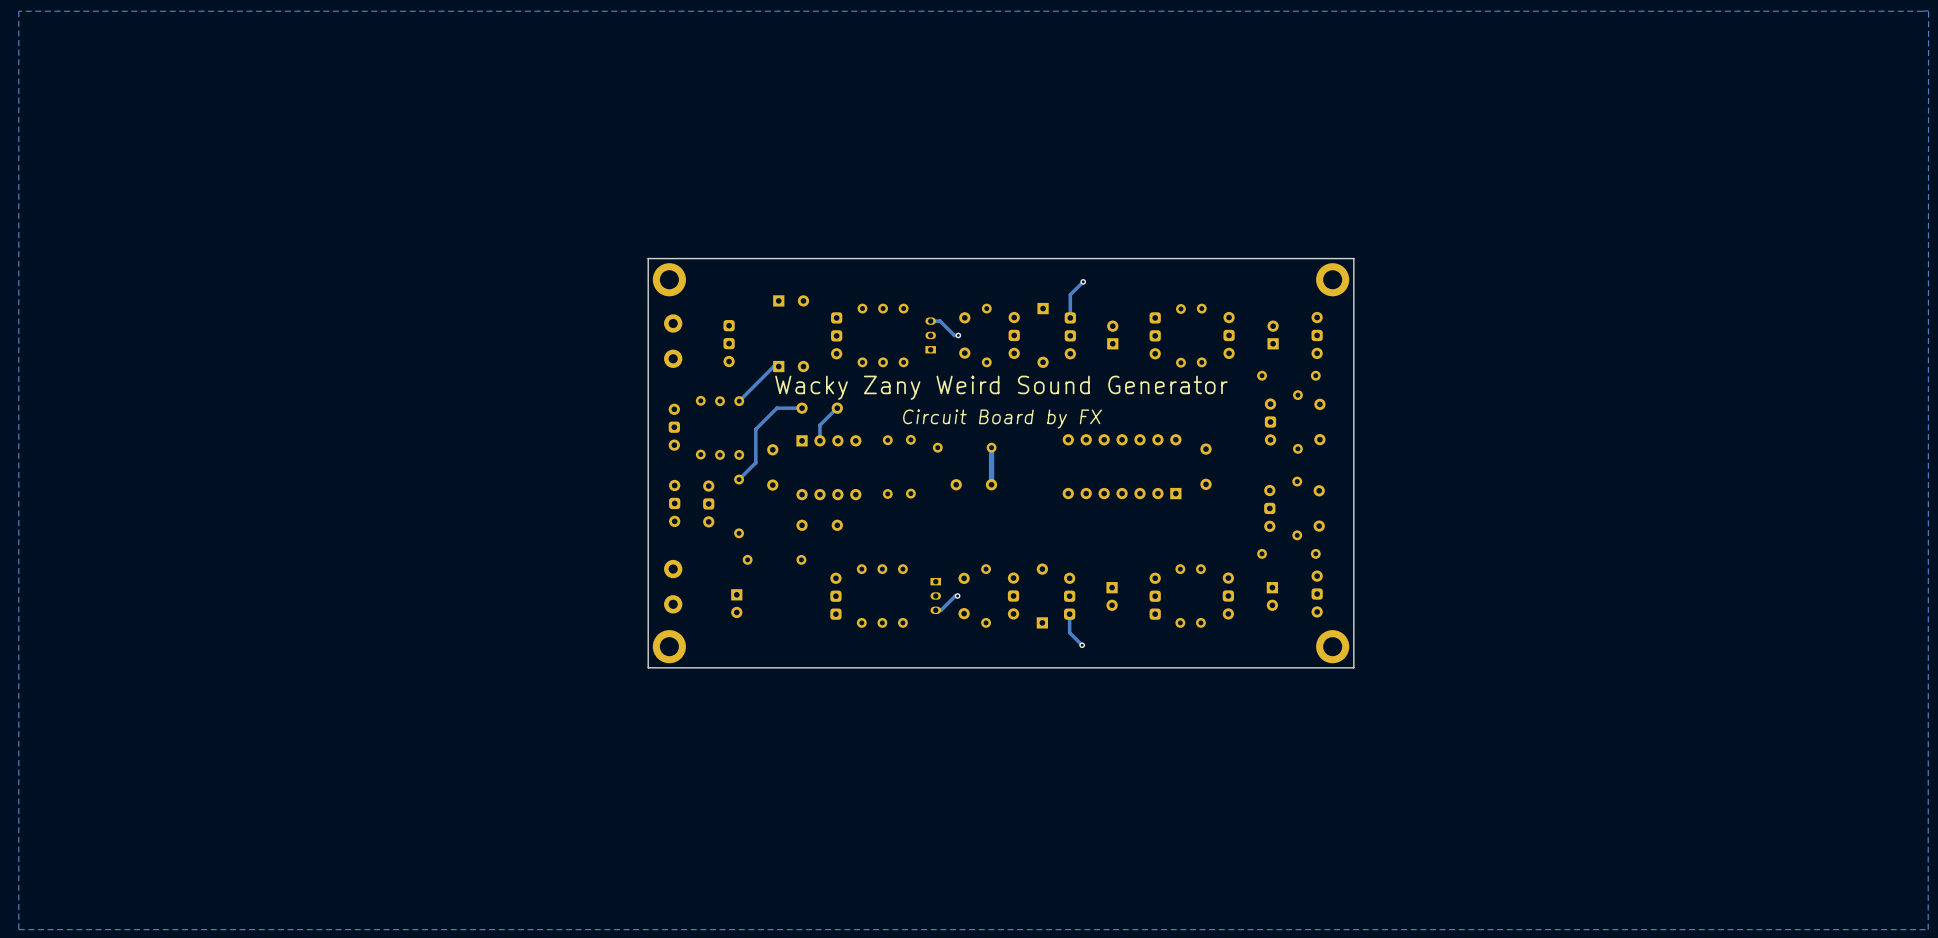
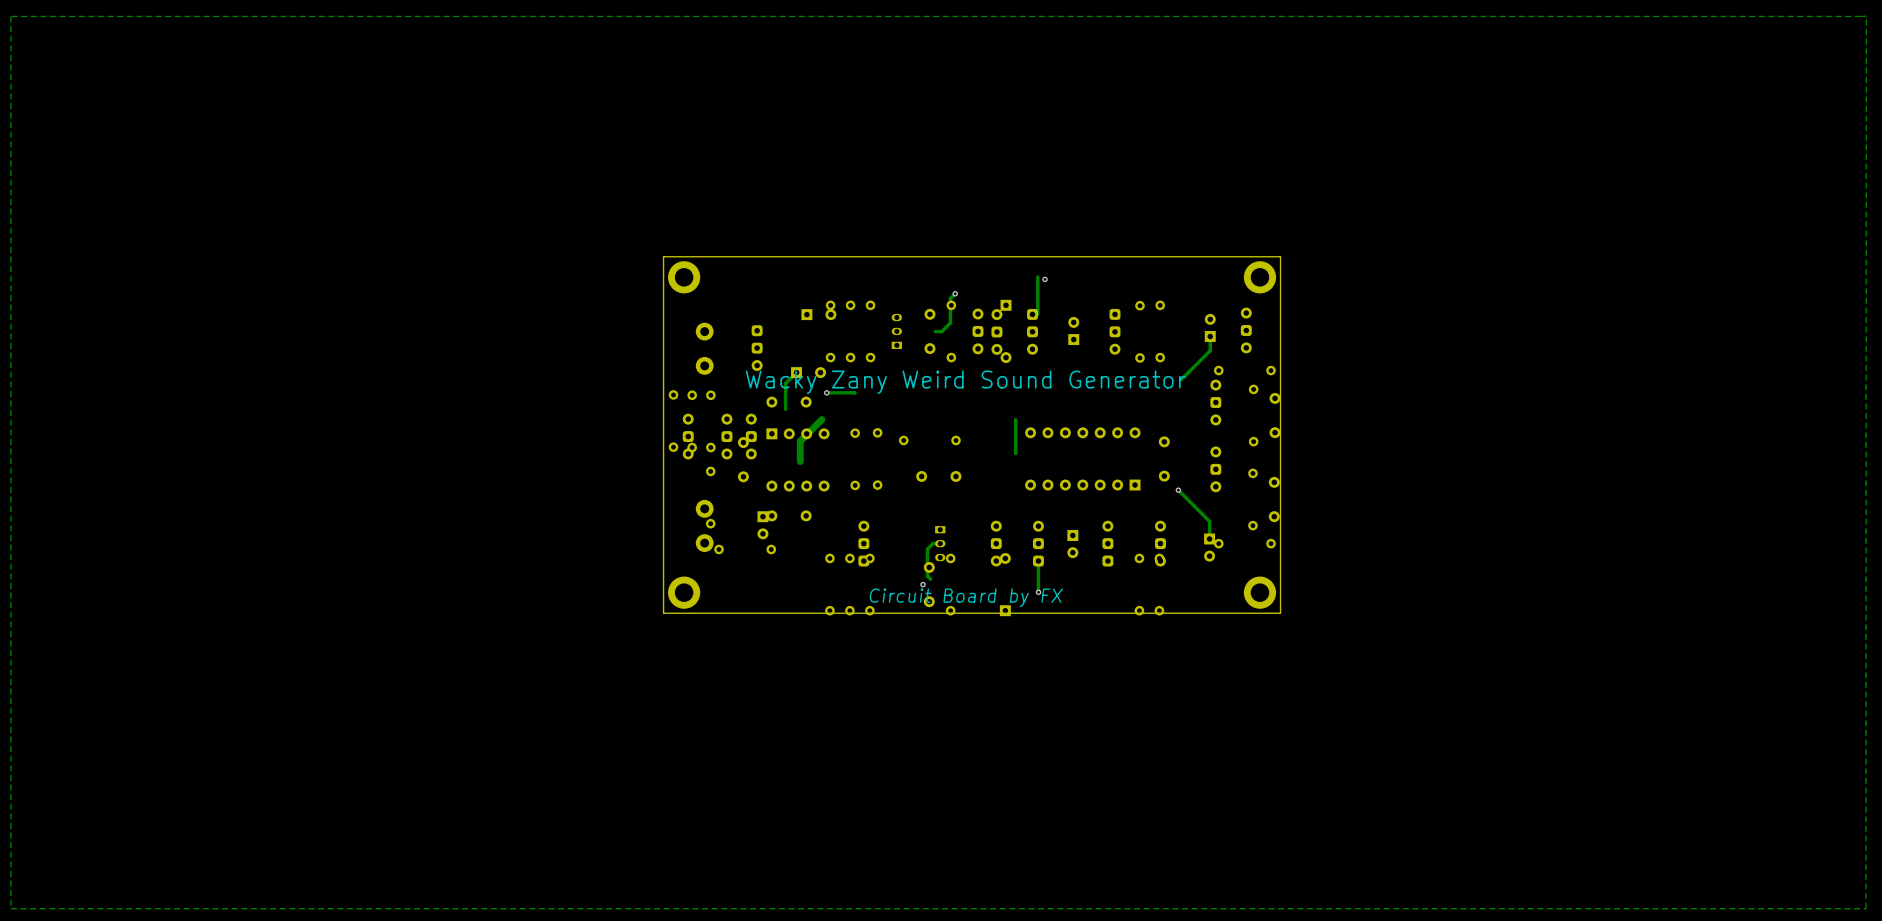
board edge: (1325, 258) (1353, 258) (1353, 667) (648, 667) (648, 258) (690, 258) -> (1280, 256) (1280, 613) (663, 613) (663, 256)
part position: (669, 279) -> (684, 277)
track: none -> (1037, 276) (1037, 314)
part position: (1332, 279) -> (1259, 277)
track: (1083, 281) (1070, 294) (1070, 317) -> none
track: none -> (955, 293) (950, 298) (950, 322) (941, 331) (935, 331)
via: none -> (955, 293)
part: (791, 300) -> none
part: none -> (818, 314)
track: (930, 321) (940, 321) (954, 335) (958, 335) -> none
part position: (1273, 334) -> (1210, 327)
part: (836, 335) -> none
via: (958, 335) -> none
part: (1229, 335) -> none
part position: (1317, 335) -> (1246, 330)
part: none -> (996, 331)
track: none -> (1210, 336) (1210, 350) (1181, 379)
part position: (673, 341) -> (704, 348)
part: (729, 343) -> none
part: none -> (757, 348)
track: (780, 366) (773, 366) (739, 401) -> none
part: (791, 366) -> none
track: none -> (796, 372) (785, 383) (785, 409)
part: none -> (808, 372)
track: none -> (826, 392) (854, 392)
via: none -> (826, 392)
track: (802, 408) (776, 408) (755, 429) (755, 462) (739, 478) -> none
track: (836, 408) (819, 425) (819, 440) -> none
text: Circuit Board by FX (1002, 419) -> none
part position: (1270, 421) -> (1215, 402)
track: none -> (821, 419) (800, 441) (800, 461)
track: none -> (1015, 419) (1015, 453)
part: (674, 427) -> none
part: none -> (688, 436)
part: none -> (726, 436)
part: none -> (751, 436)
track: (991, 447) (991, 484) -> none
part: none -> (1215, 469)
track: none -> (1178, 490) (1209, 521) (1209, 538)
via: none -> (1178, 490)
part: (674, 503) -> none
part: (708, 503) -> none
part: (1269, 508) -> none
track: none -> (940, 543) (933, 543) (927, 549) (927, 576) (930, 579)
part: none -> (1160, 543)
track: none -> (1038, 561) (1038, 592)
part position: (673, 586) -> (704, 525)
part: (1317, 594) -> none
part position: (835, 596) -> (863, 543)
part position: (935, 596) -> (940, 543)
track: (957, 596) (941, 610) (935, 610) -> none
part position: (1013, 596) -> (996, 543)
part position: (1069, 596) -> (1038, 543)
part position: (1112, 596) -> (1072, 544)
part position: (1155, 596) -> (1107, 543)
part: (1228, 596) -> none
part position: (1272, 596) -> (1209, 547)
part position: (736, 603) -> (762, 525)
text: none -> Circuit Board by FX (966, 597)
track: (1069, 613) (1069, 632) (1082, 645) -> none
via position: (1082, 645) -> (1038, 592)
part position: (669, 646) -> (684, 592)
part position: (1332, 646) -> (1259, 592)

